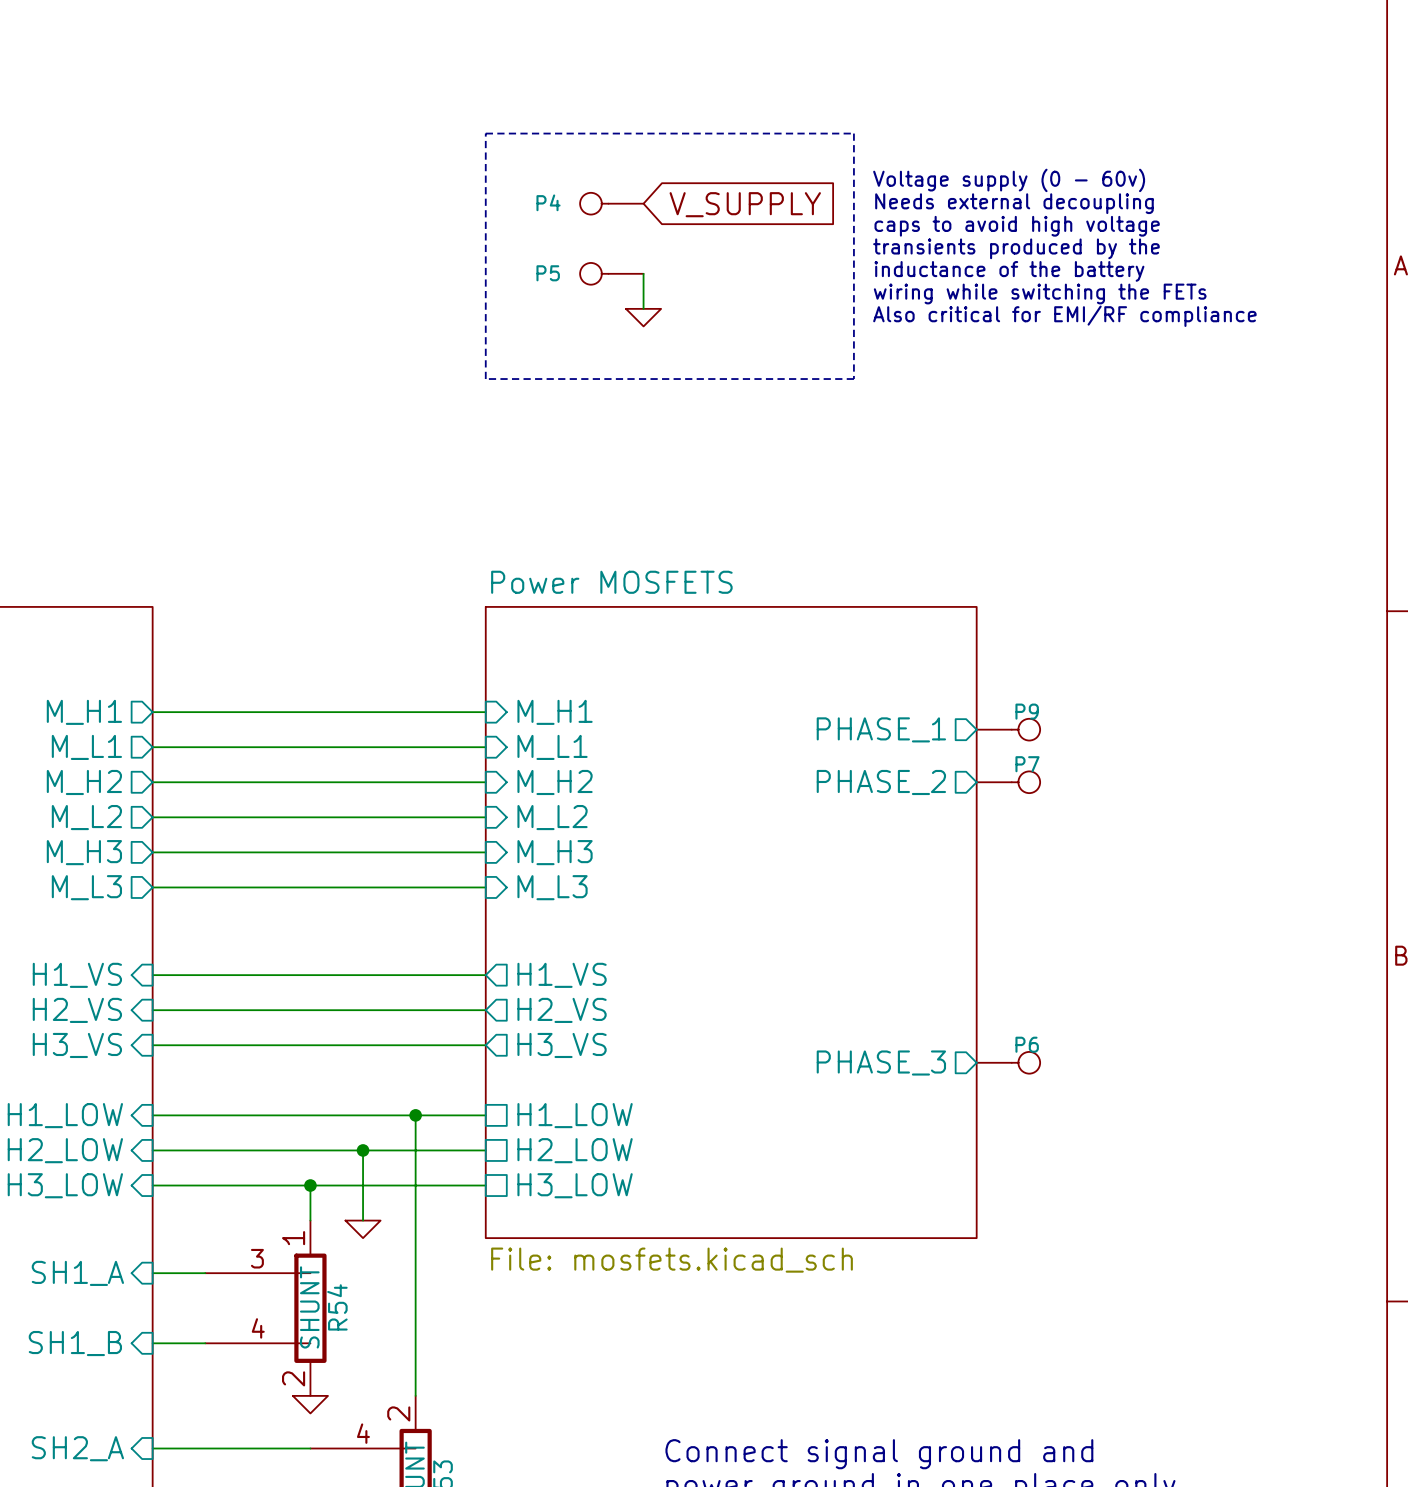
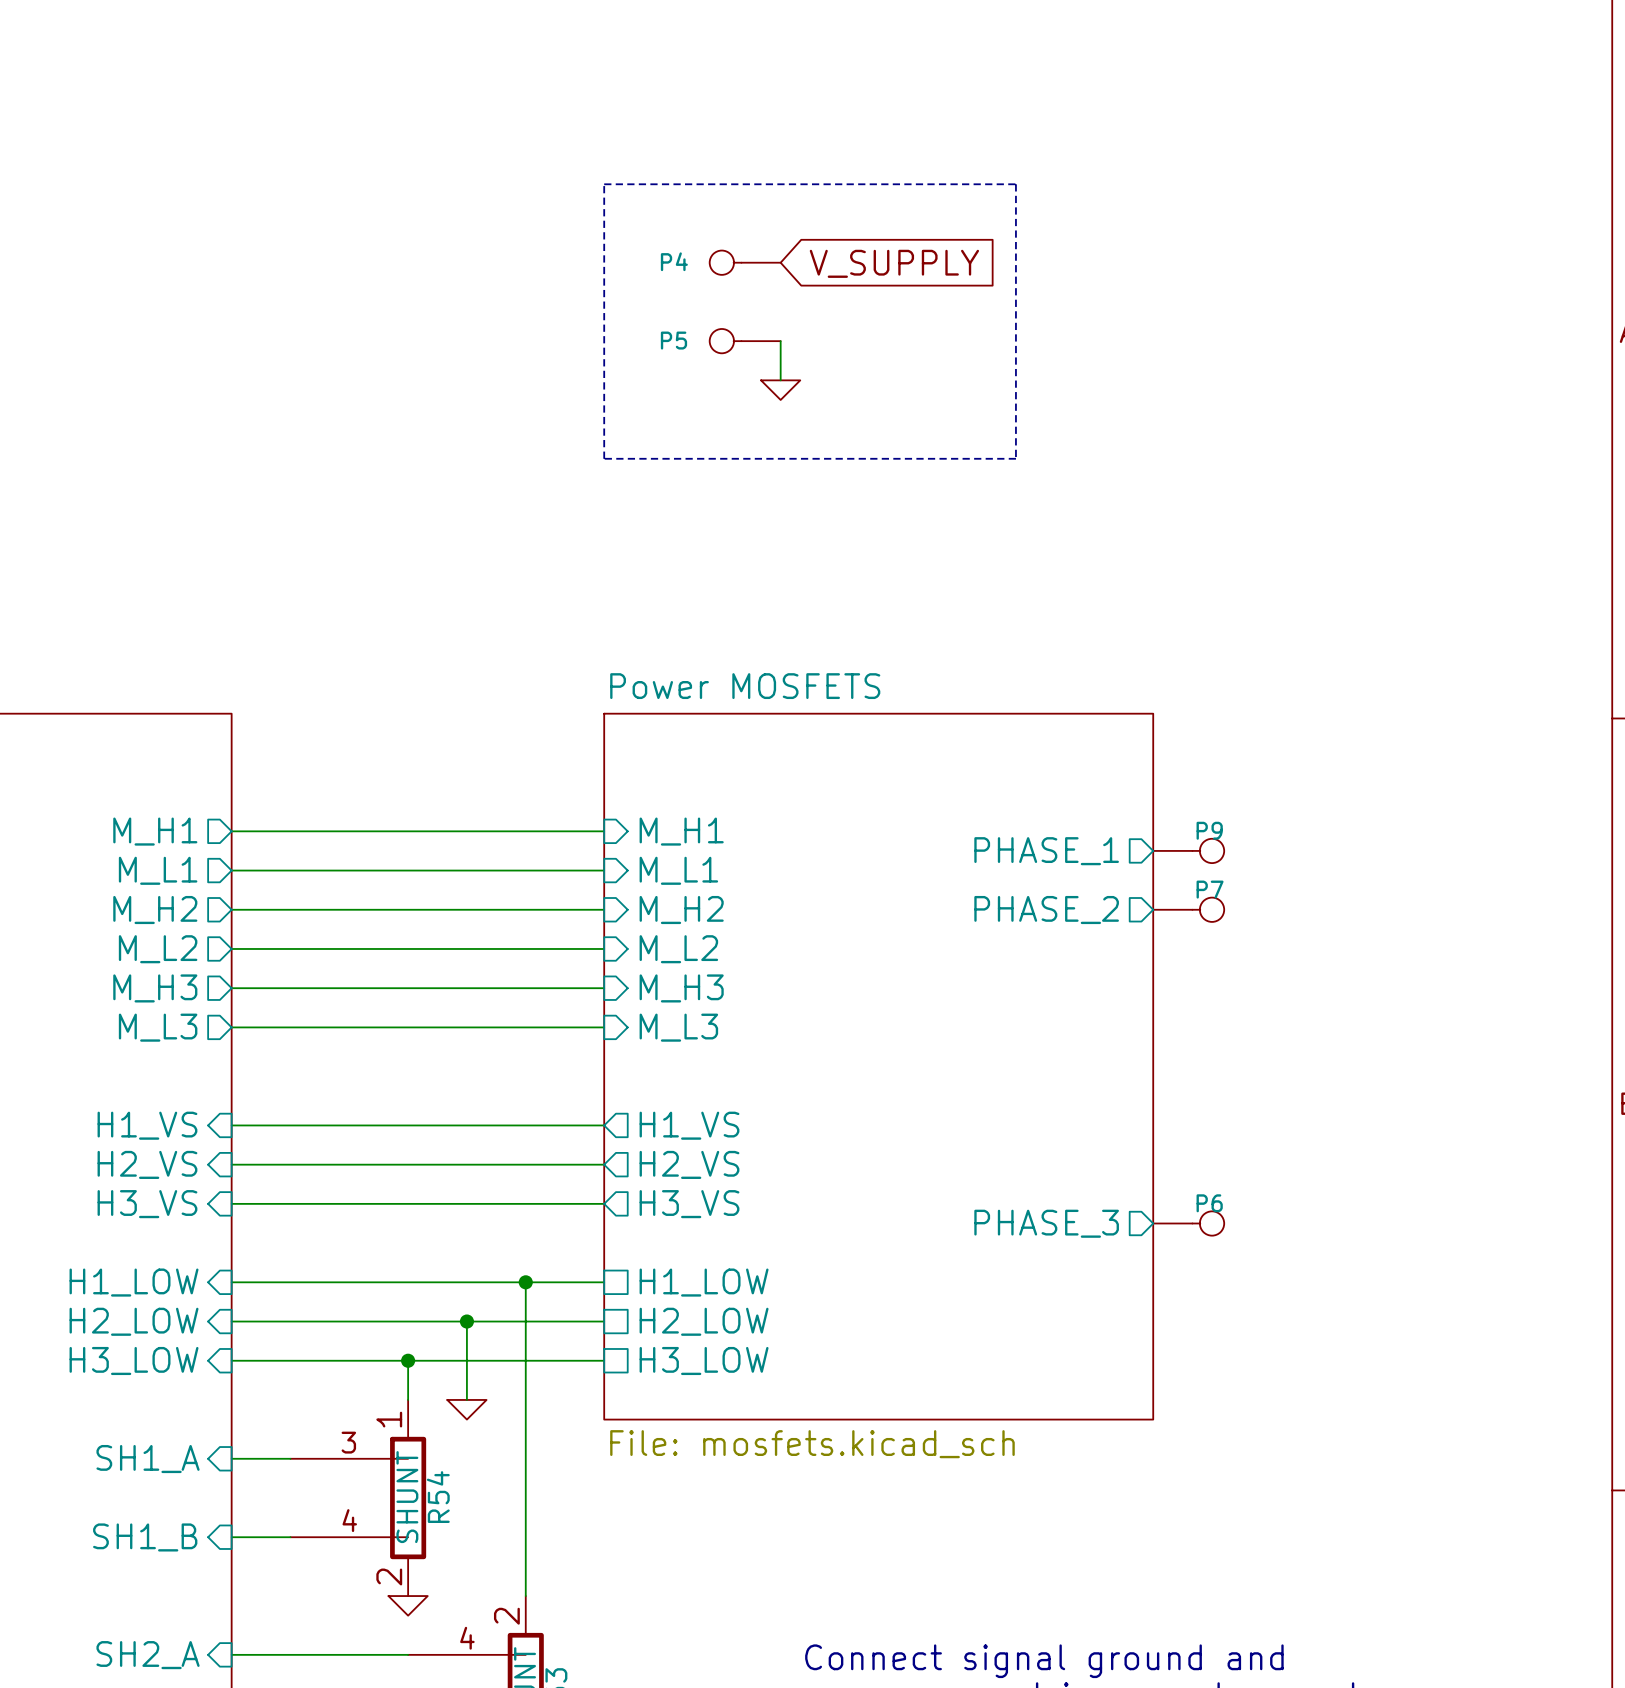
text: Voltage supply (0 - 60v) (1009, 180) -> none
text: Needs external decoupling (1014, 203) -> none
text: caps to avoid high voltage (1017, 226) -> none
text: transients produced by the (1016, 248) -> none
text: inductance of the battery (1009, 271) -> none
text: wiring while switching the FETs (1040, 293) -> none
text: Also critical for EMI/RF compliance (1064, 316) -> none

